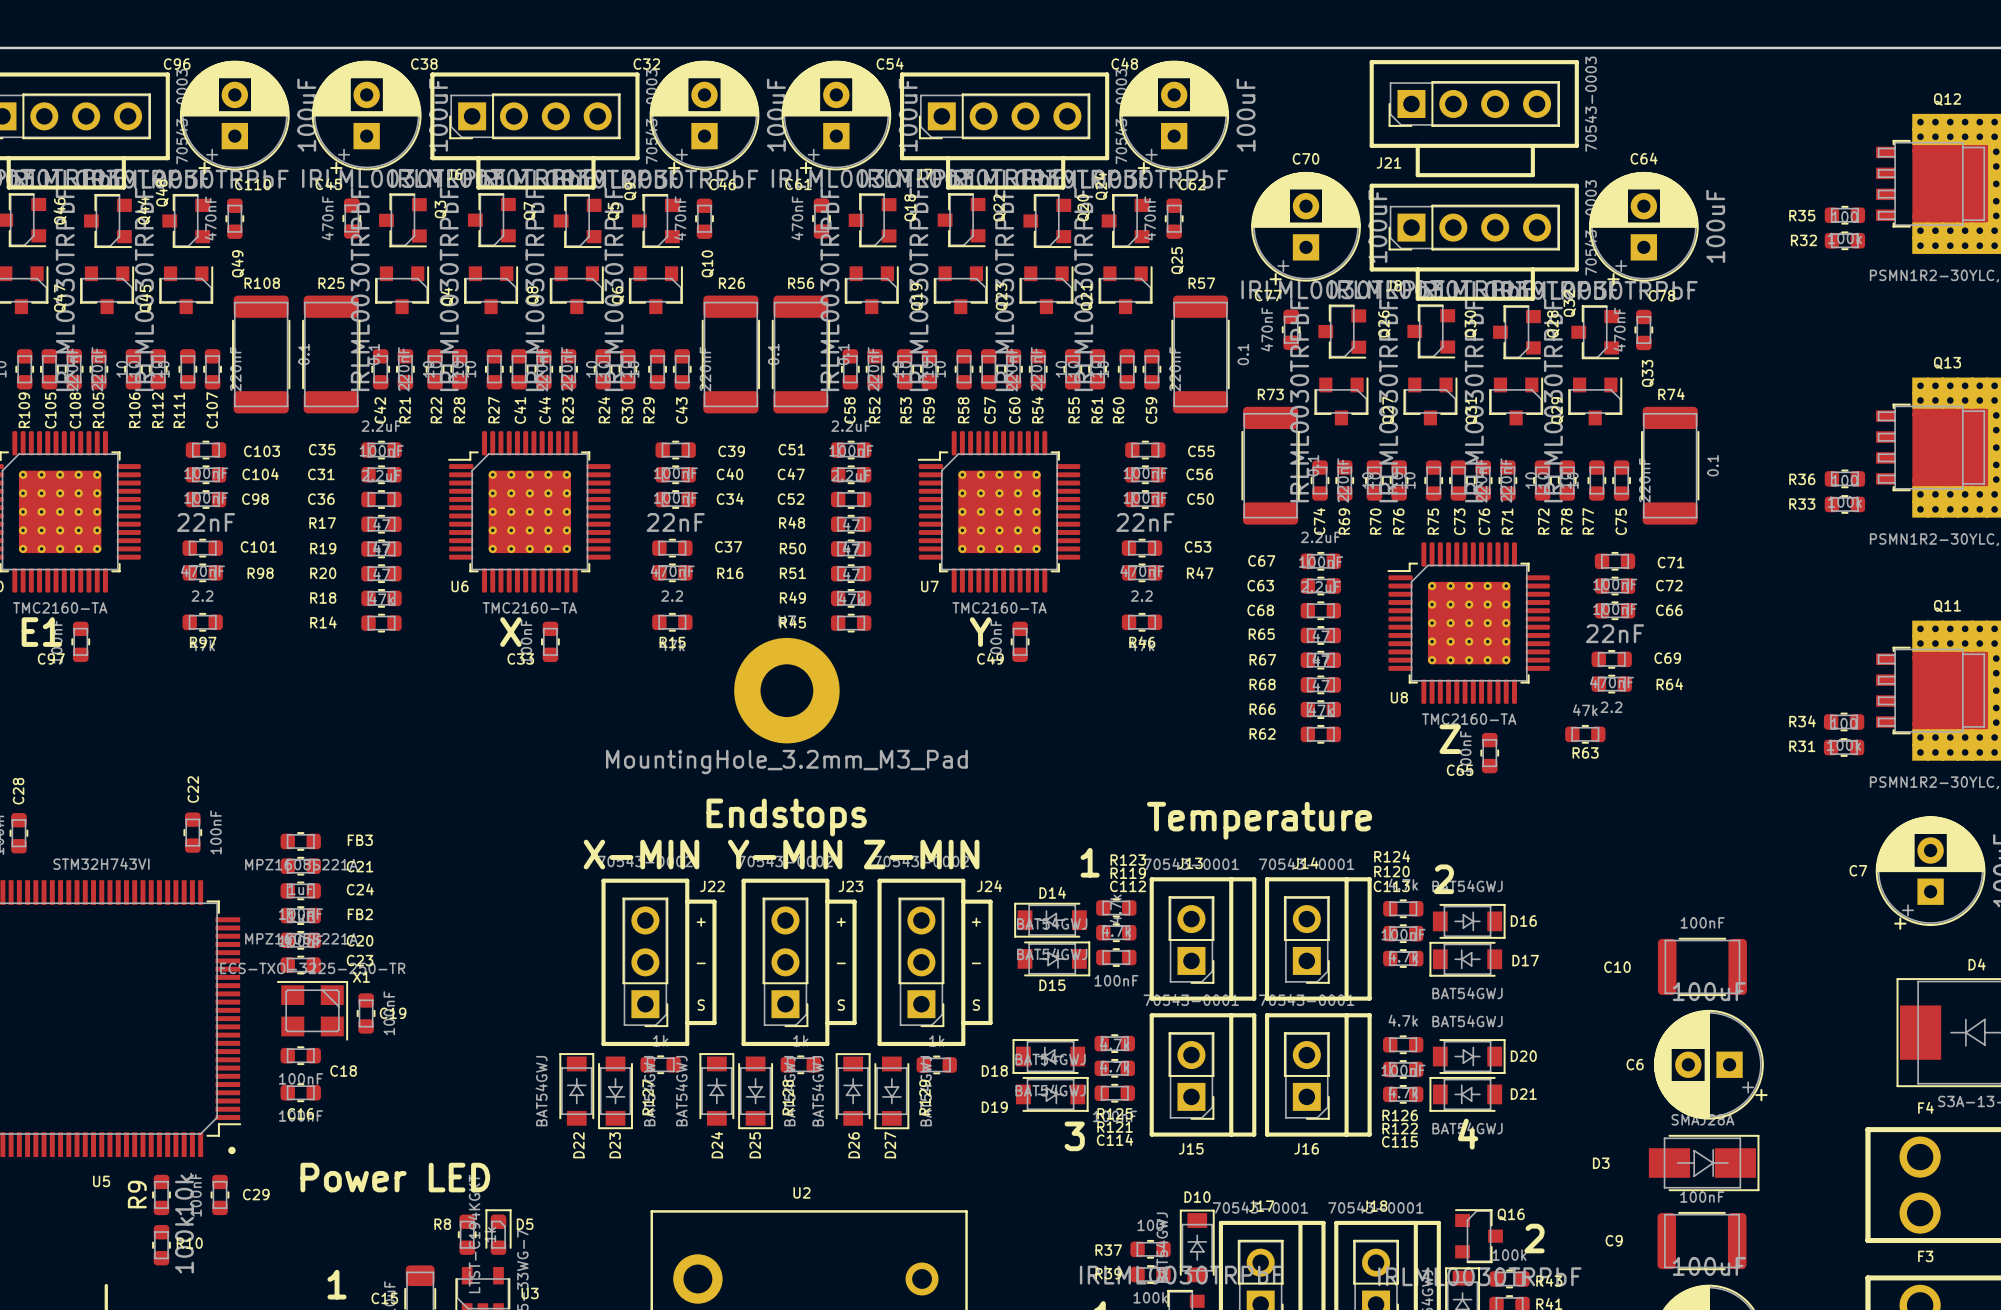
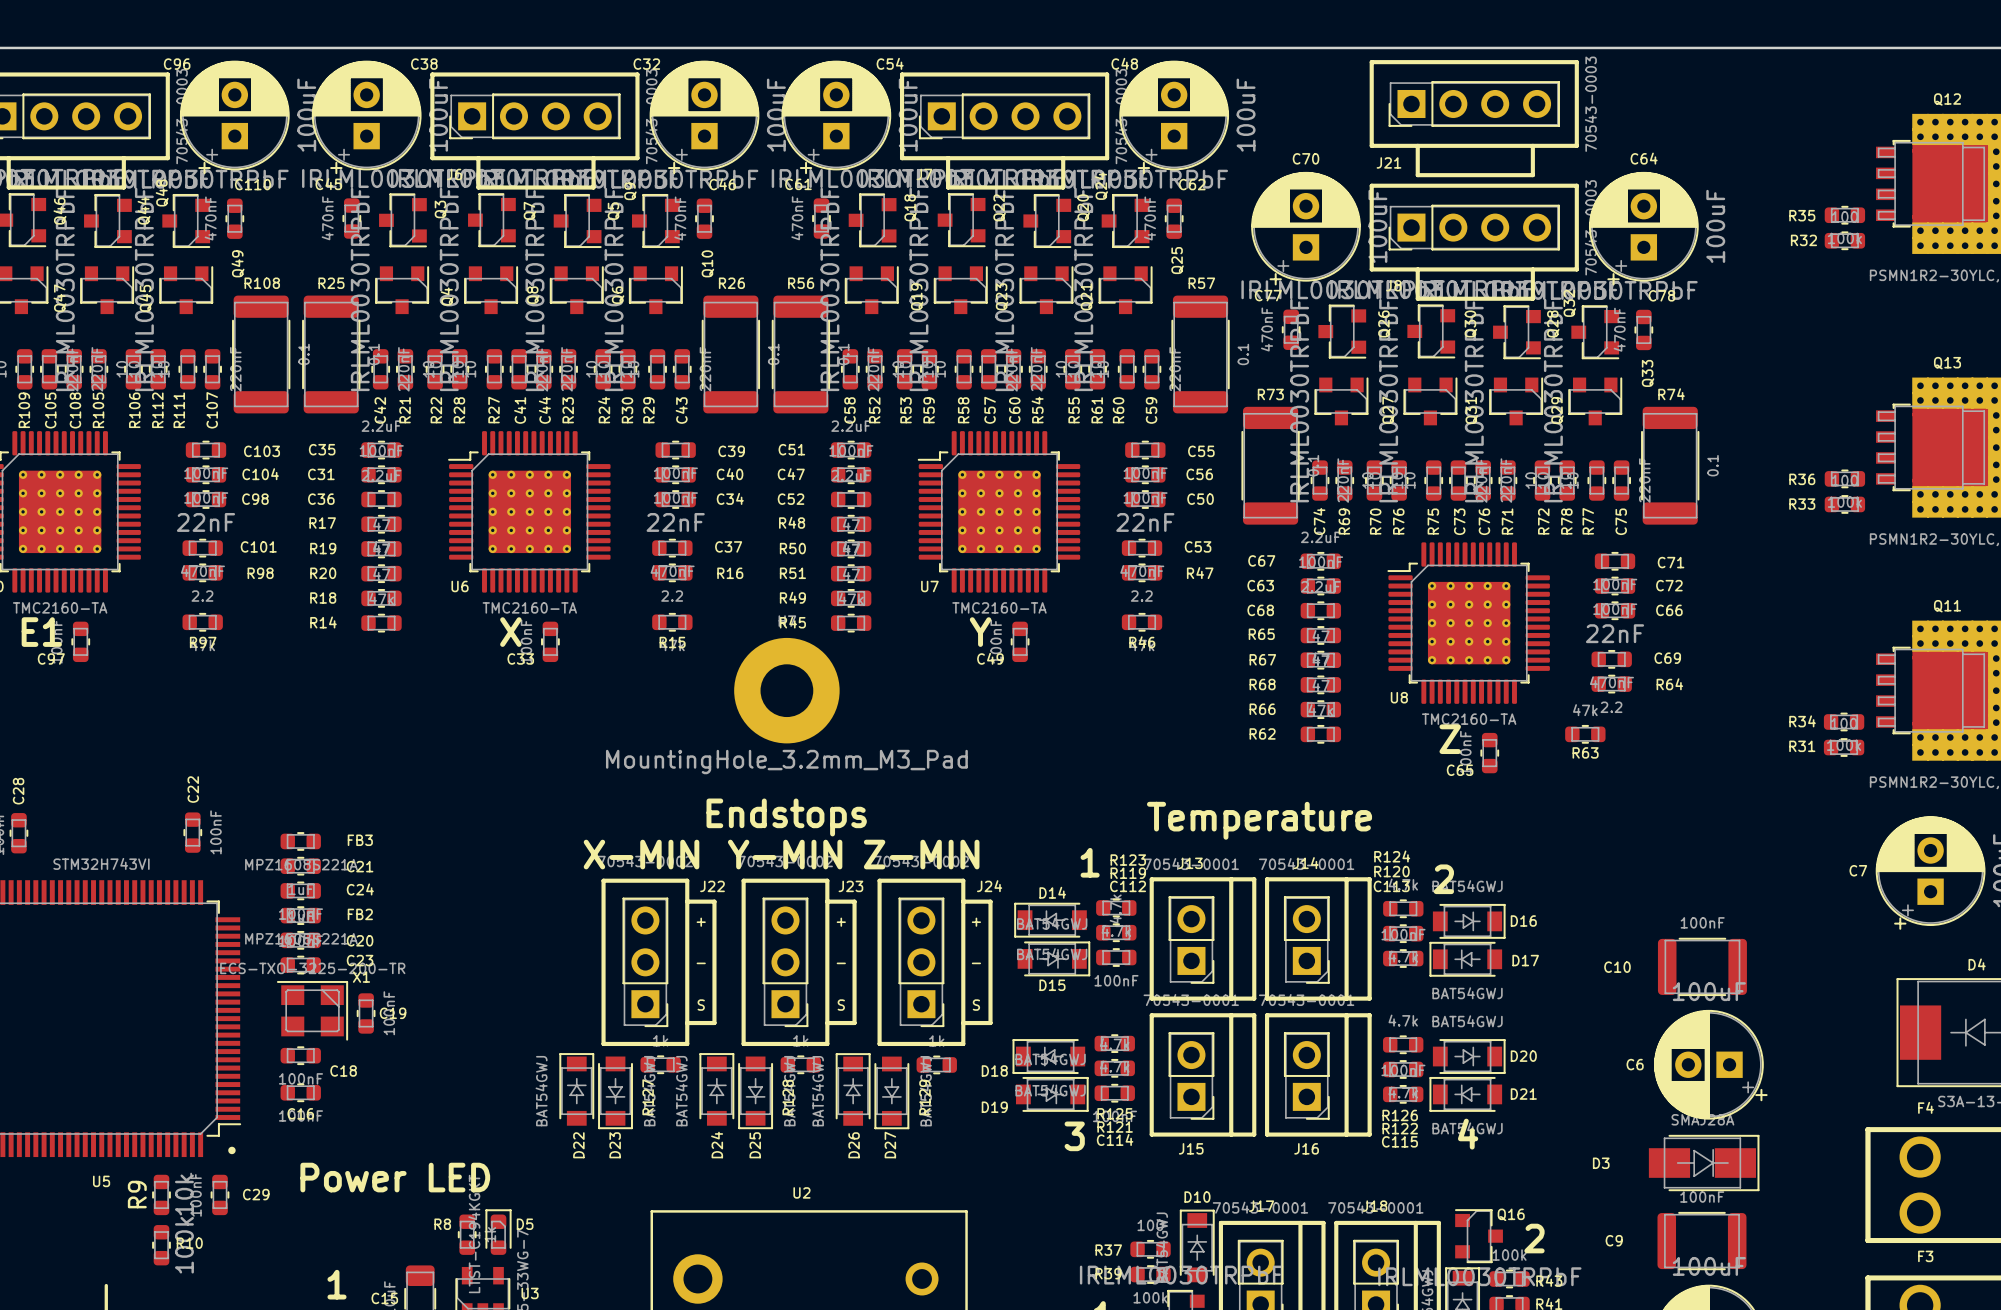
X1 value: ECS-TXO-3225-250-TR (312, 968) -> ECS-TXO-3225-200-TR (312, 968)

